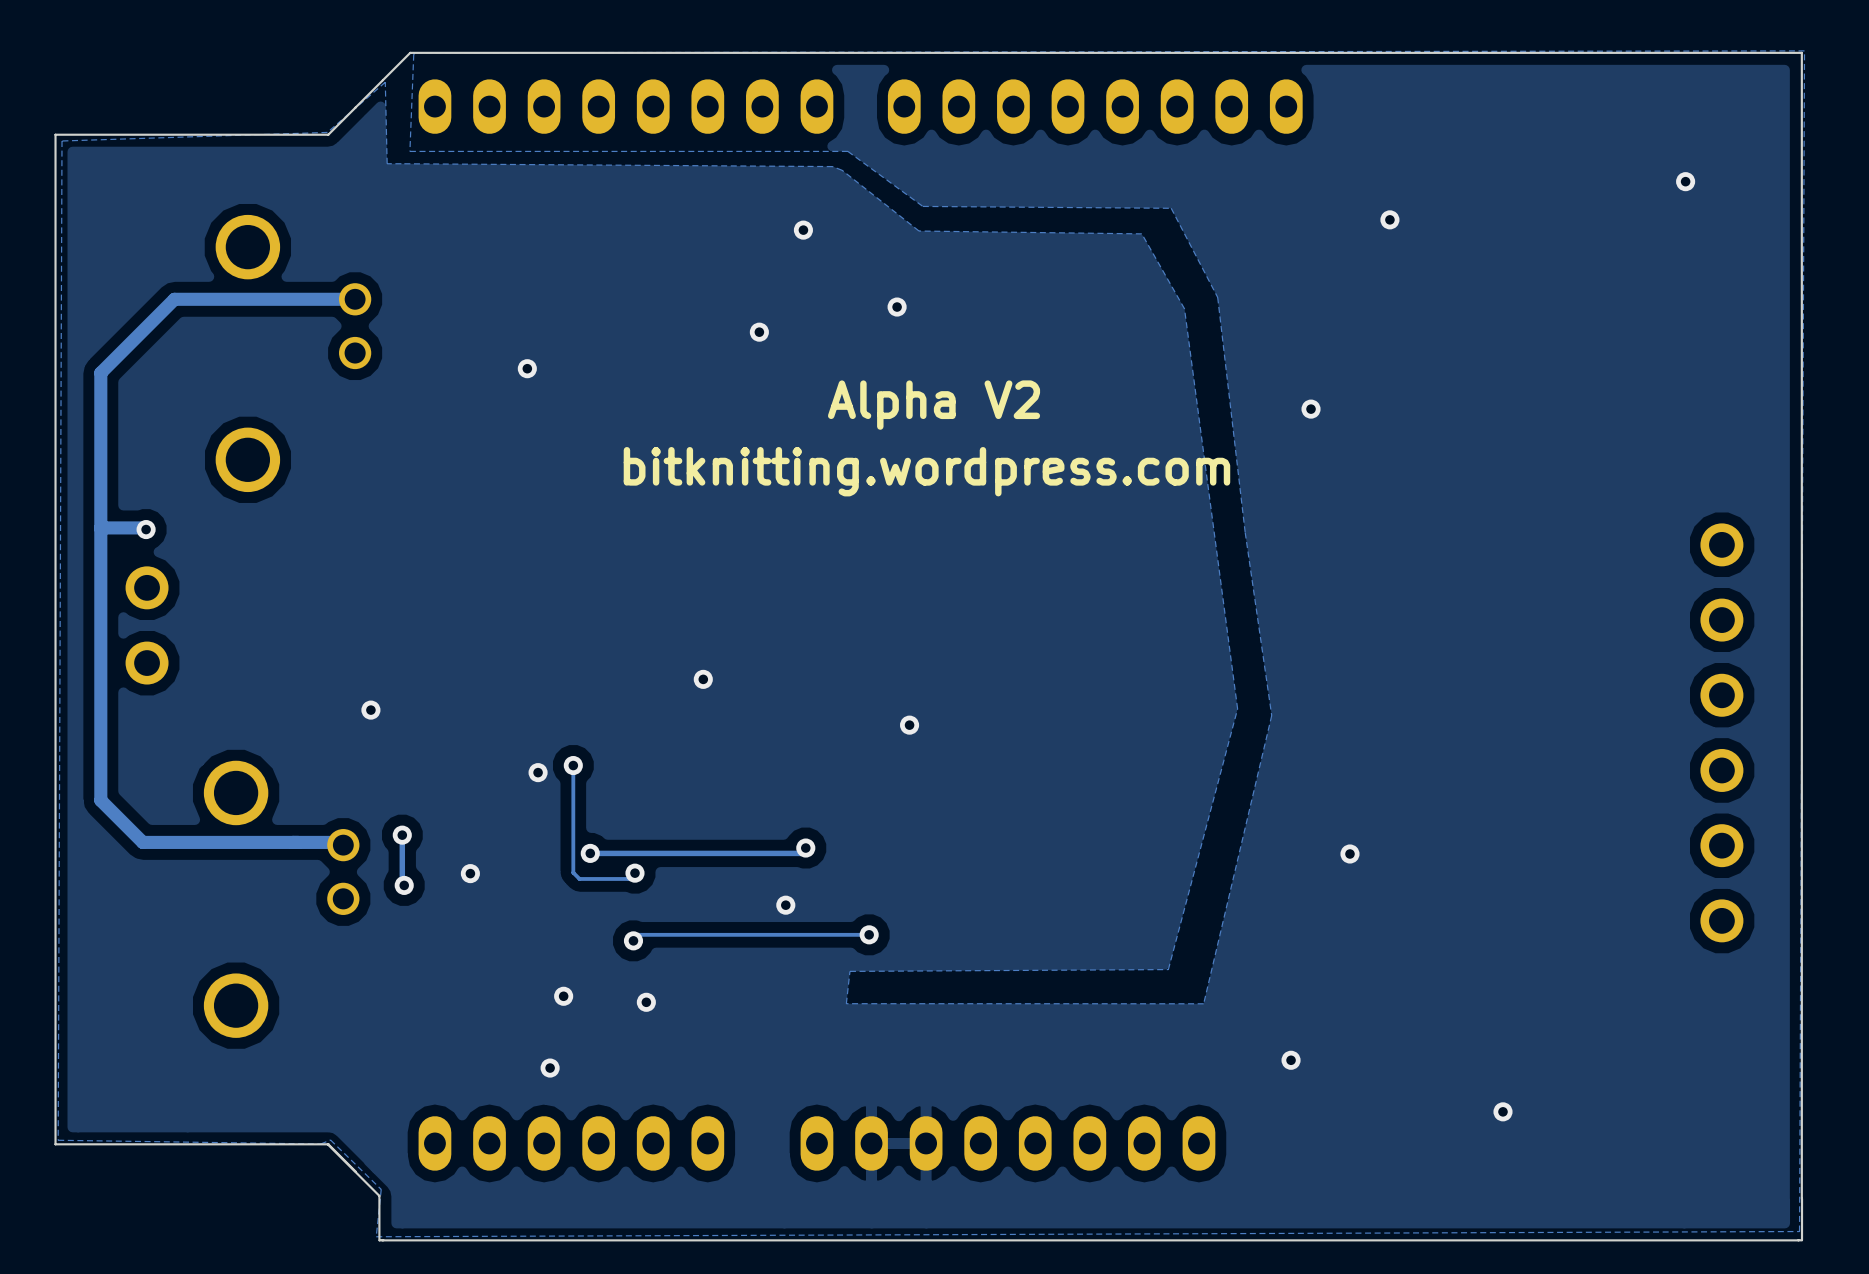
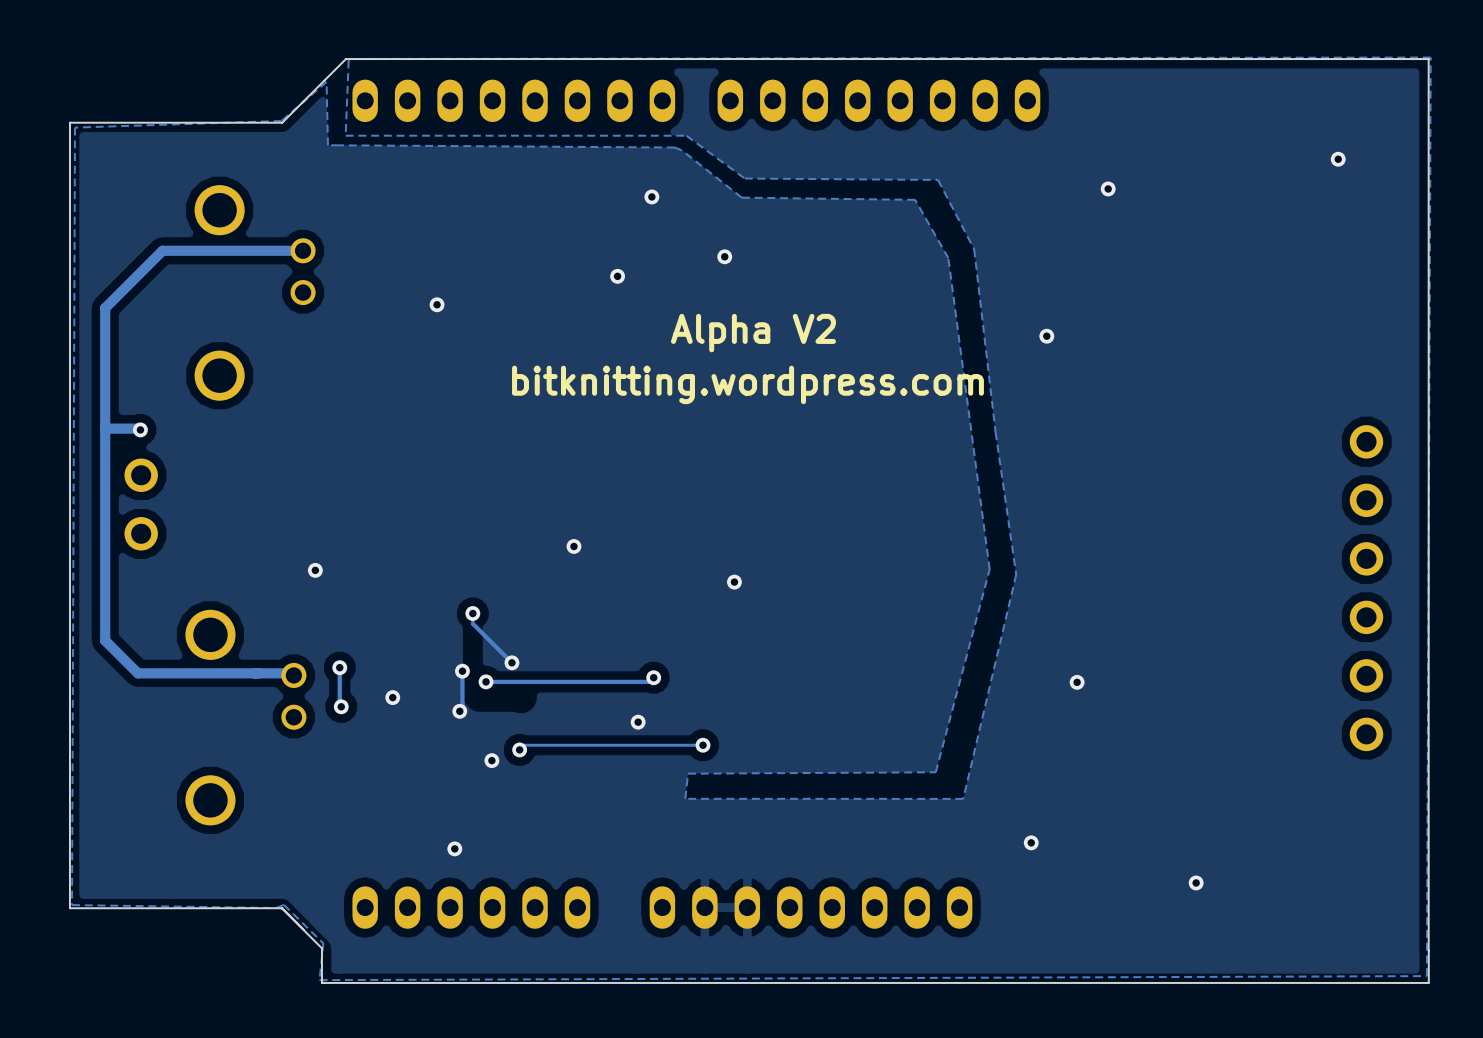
via: (538, 772) -> none
track: (573, 778) (573, 872) (579, 878) (629, 878) (634, 873) -> (472, 623) (511, 662)
via: none -> (511, 662)
track: none -> (462, 671) (462, 708) (459, 711)
via: none -> (462, 671)
via: (634, 873) -> none
via: none -> (459, 711)
via: none -> (491, 760)
via: (563, 996) -> none
via: (646, 1002) -> none

